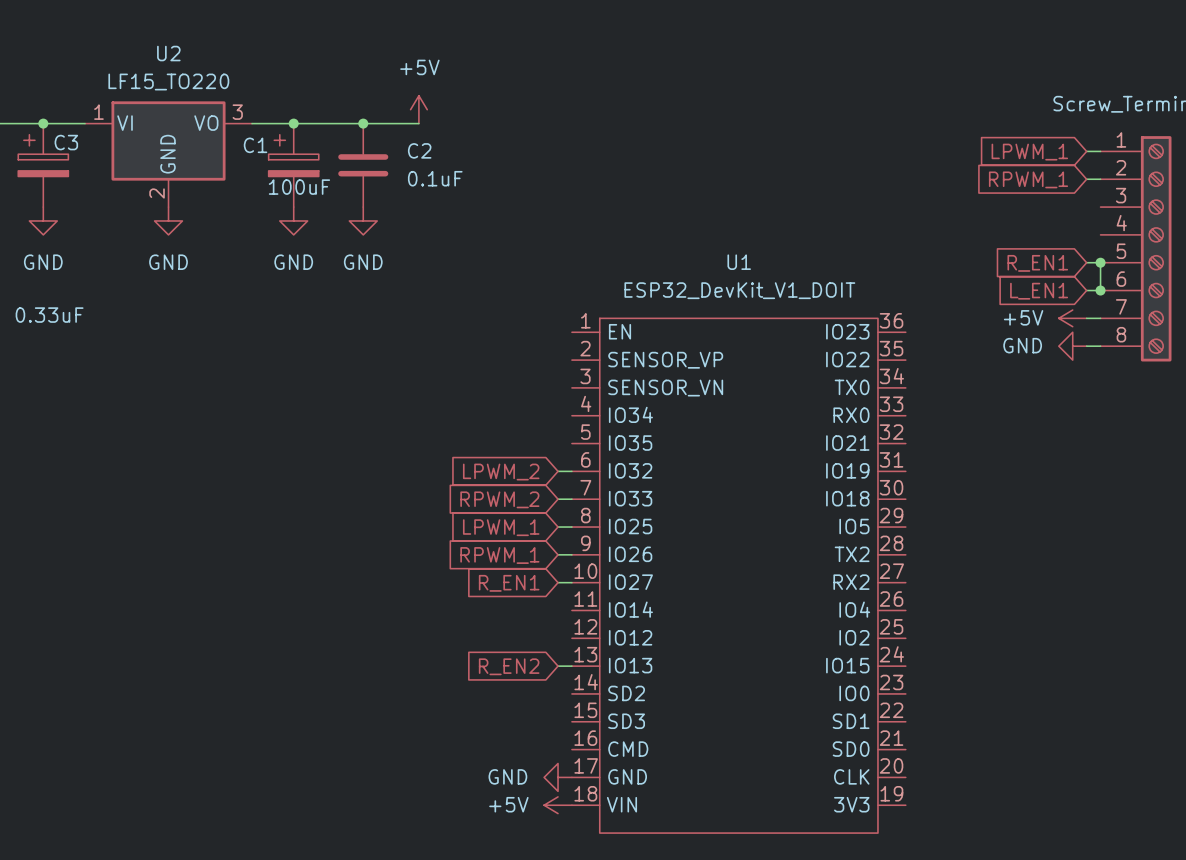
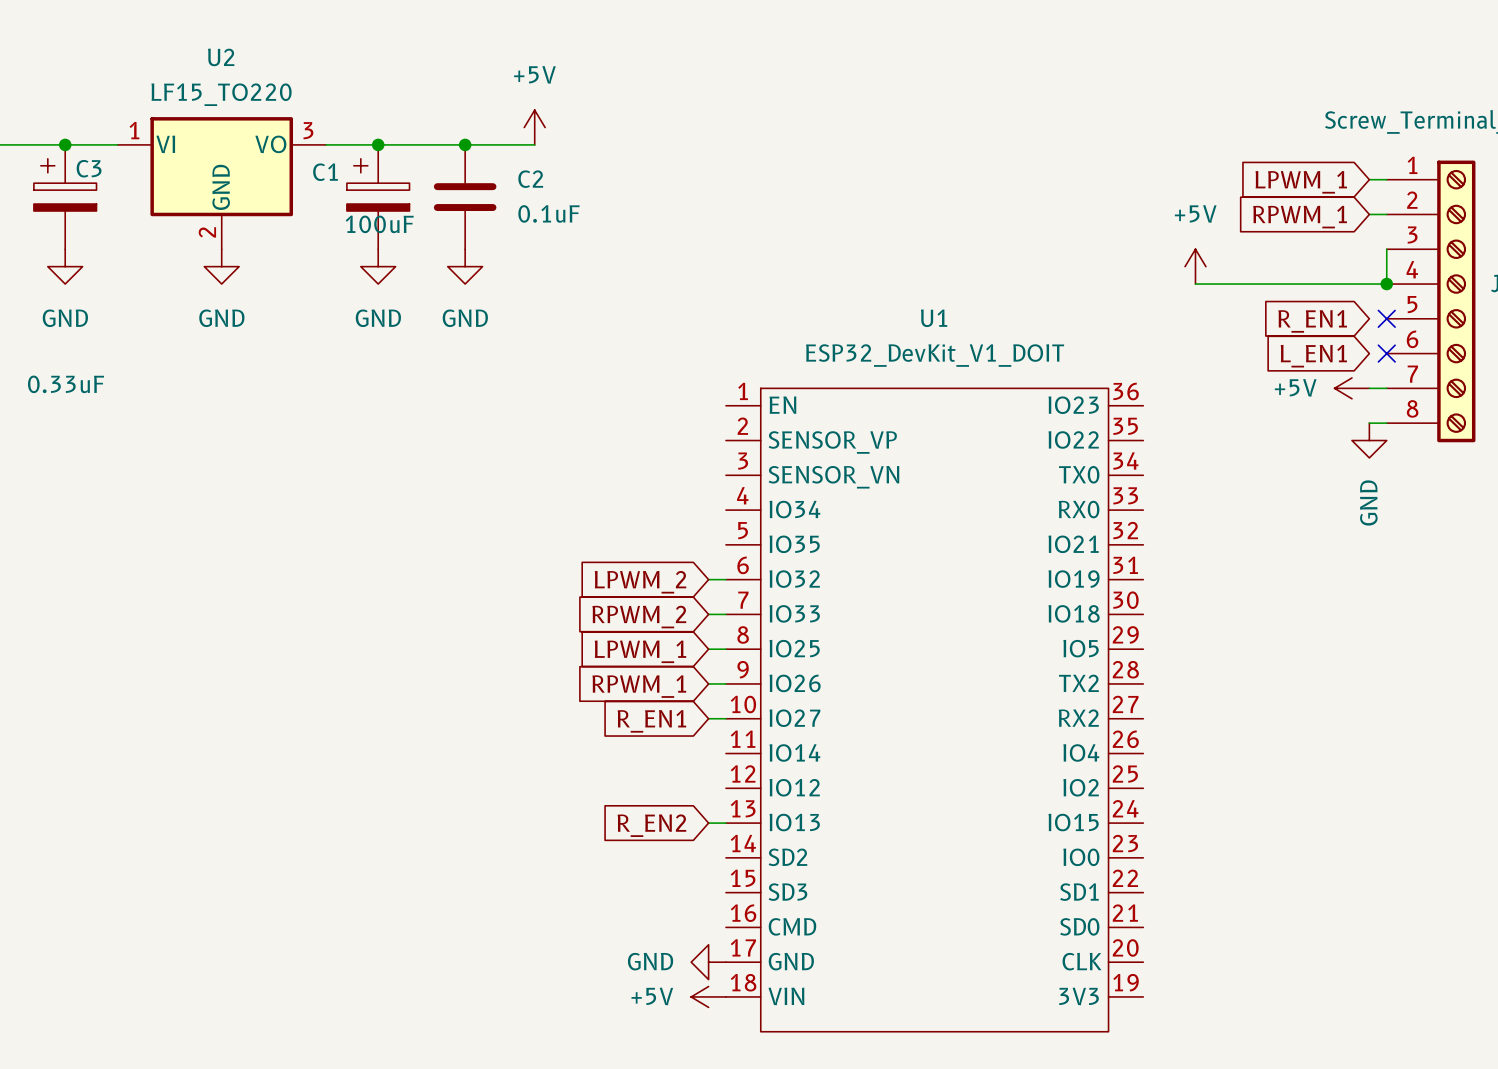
wire: none -> (1386, 249) (1386, 284) (1195, 284)
power symbol: none -> +5V (1195, 266)
junction: none -> (1386, 284)
wire: (1086, 262) (1100, 262) (1100, 290) (1086, 290) -> none
junction: (1100, 262) -> none
no-connect mark: none -> (1386, 318)
junction: (1100, 290) -> none
no-connect mark: none -> (1386, 353)
power symbol rotation: 0° (1072, 346) -> 90° counterclockwise (1369, 440)
power symbol position: GND (1072, 346) -> GND (1369, 440)

